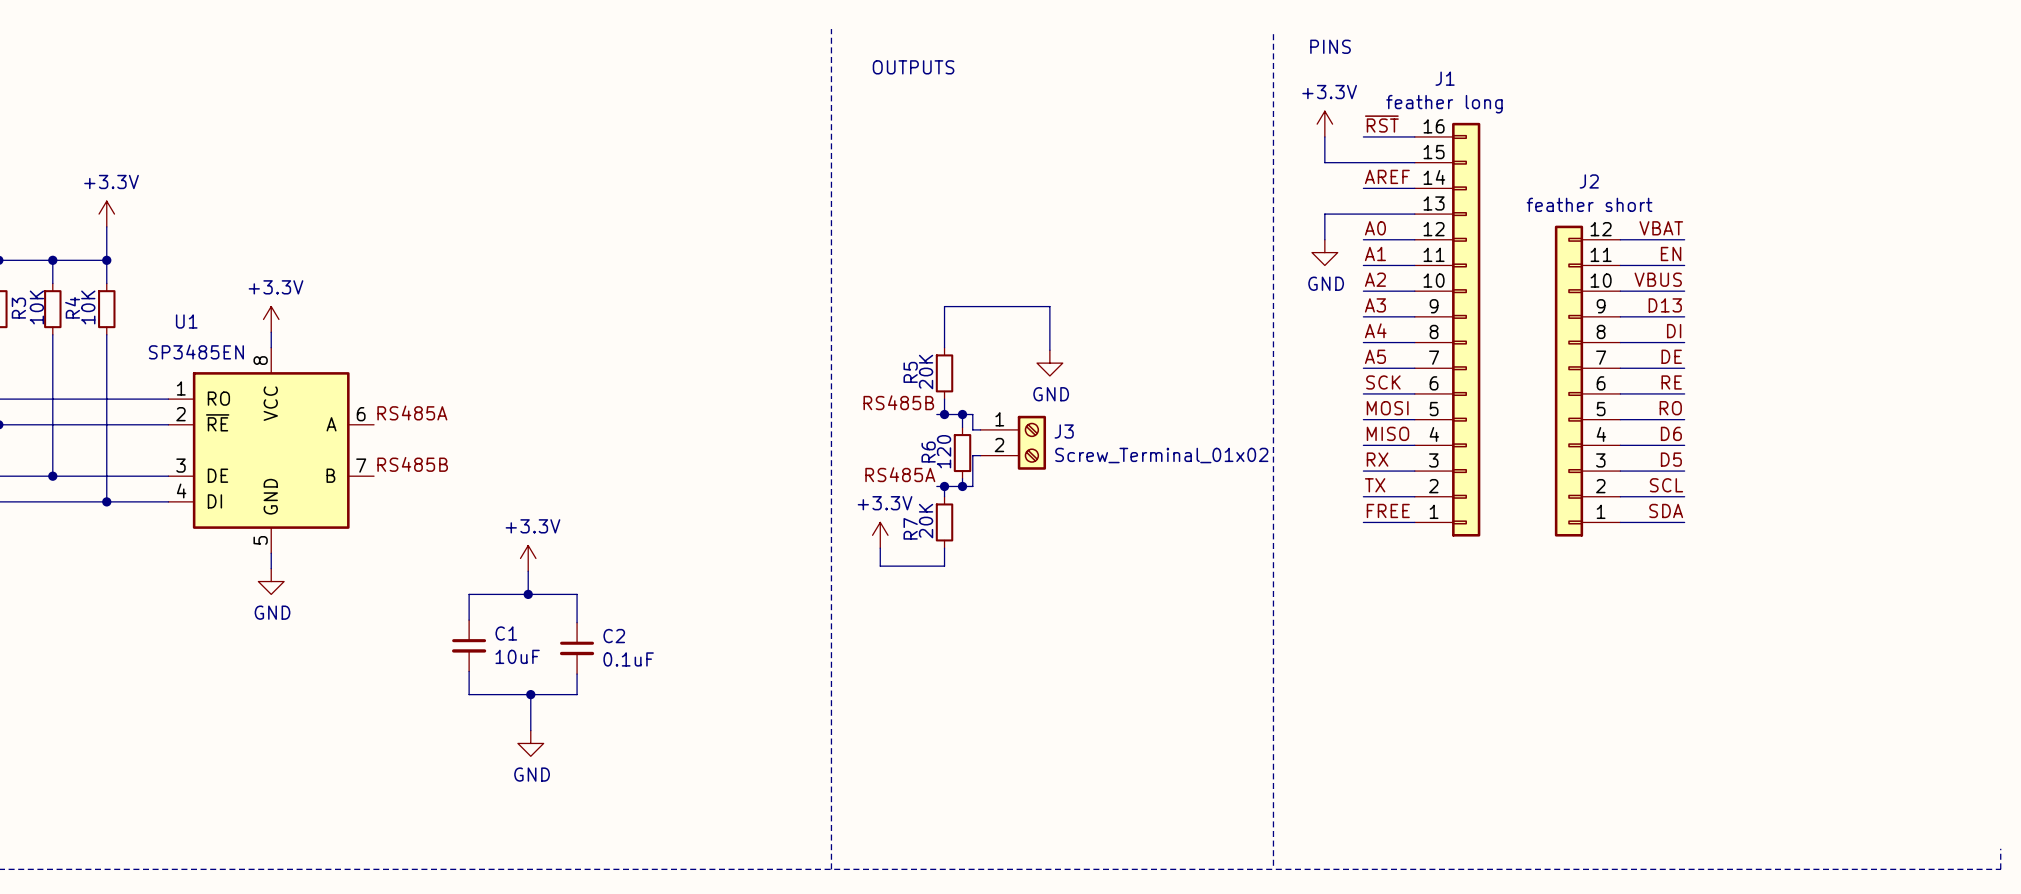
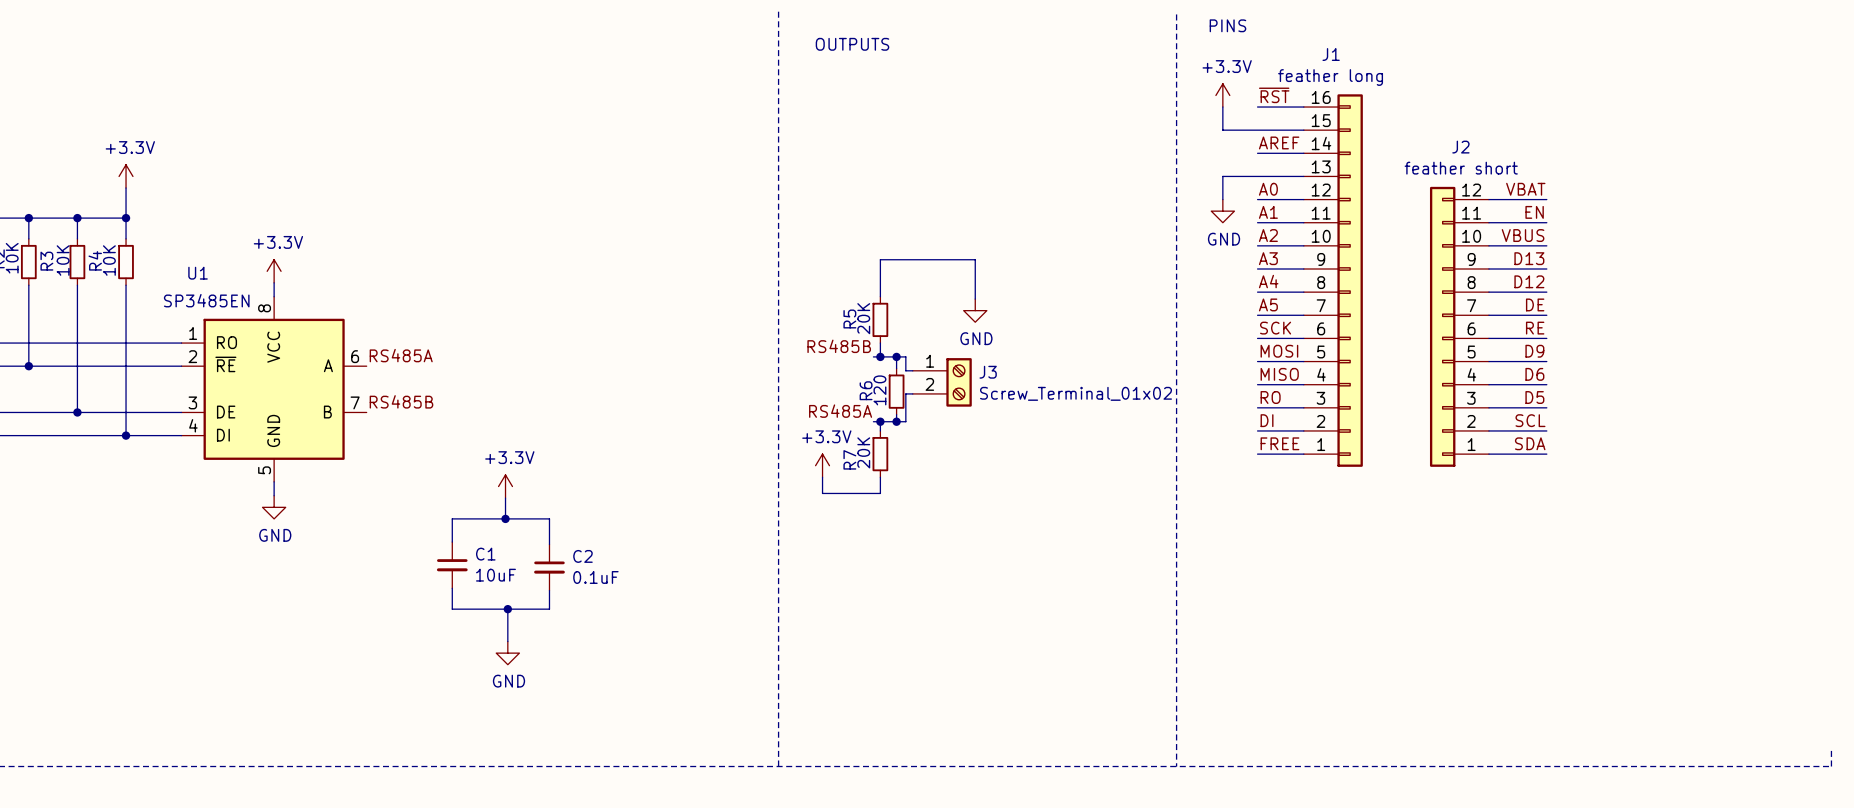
label: DI (1674, 331) -> D12 (1529, 281)
label: RO (1670, 408) -> D9 (1534, 351)
label: RX (1377, 459) -> RO (1270, 397)
label: TX (1375, 485) -> DI (1267, 420)

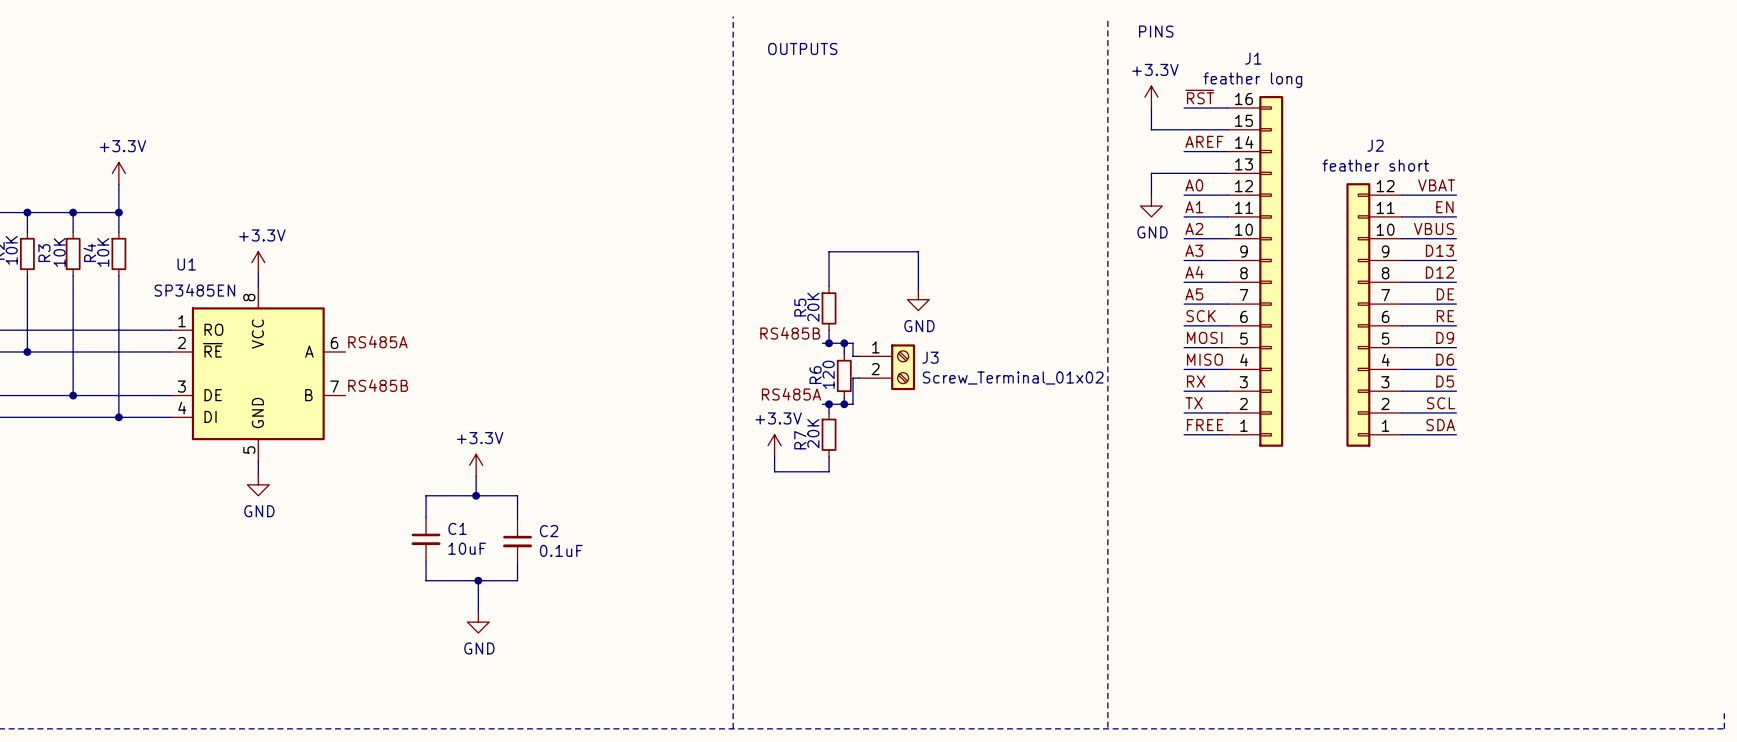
label: RO (1270, 397) -> RX (1196, 381)
label: DI (1267, 420) -> TX (1194, 403)

